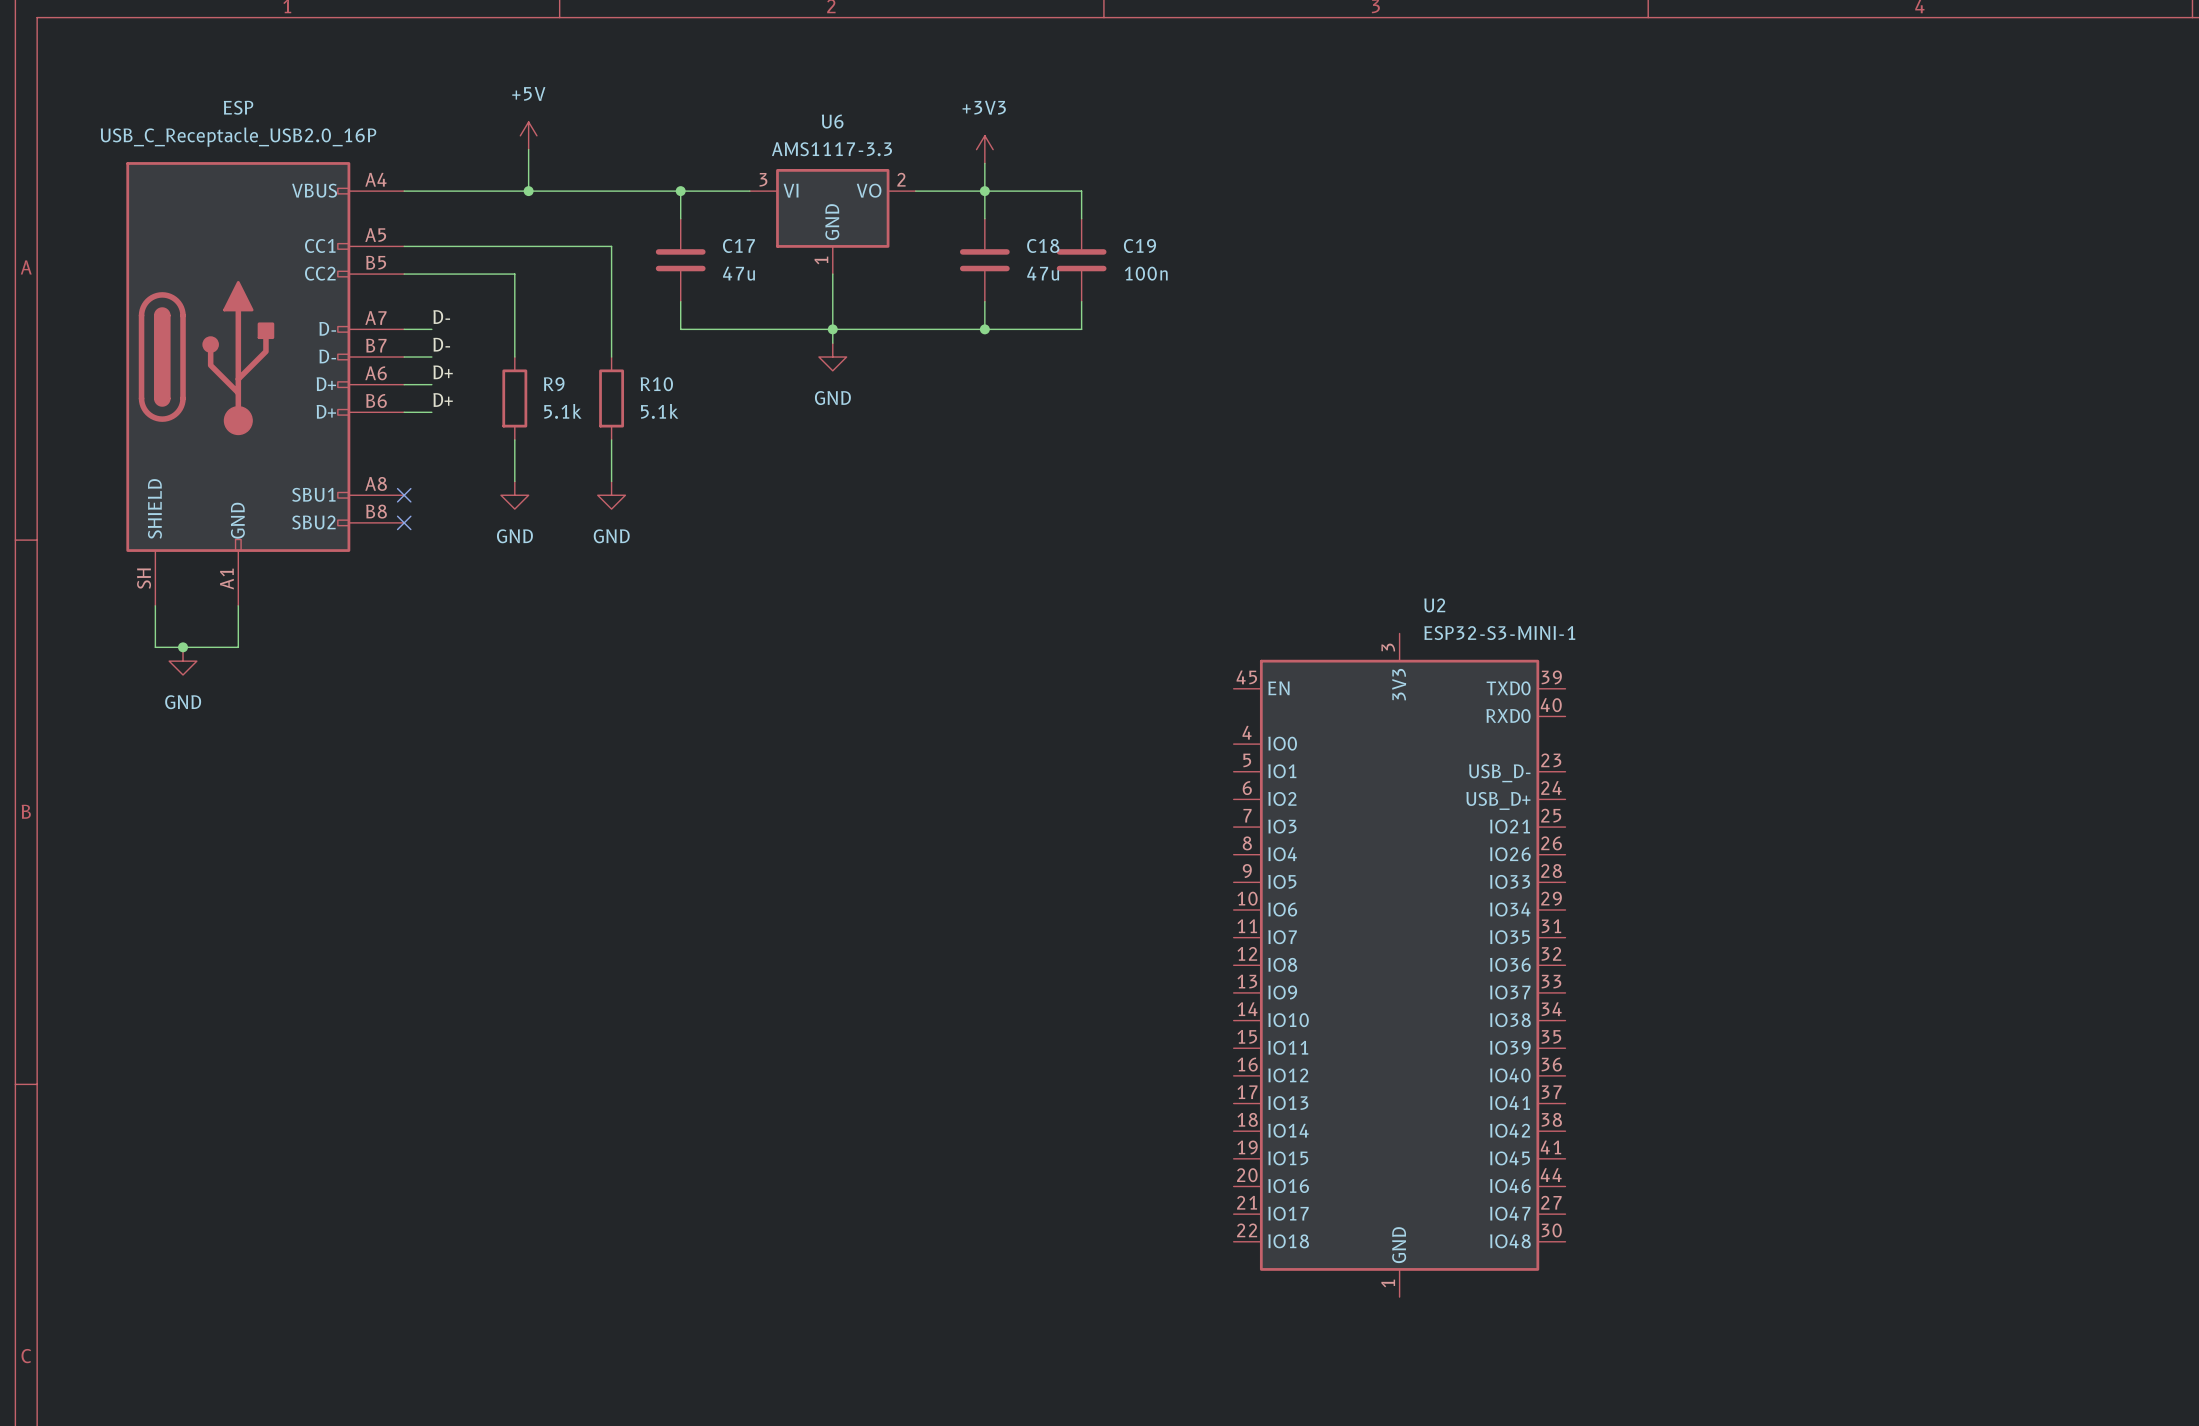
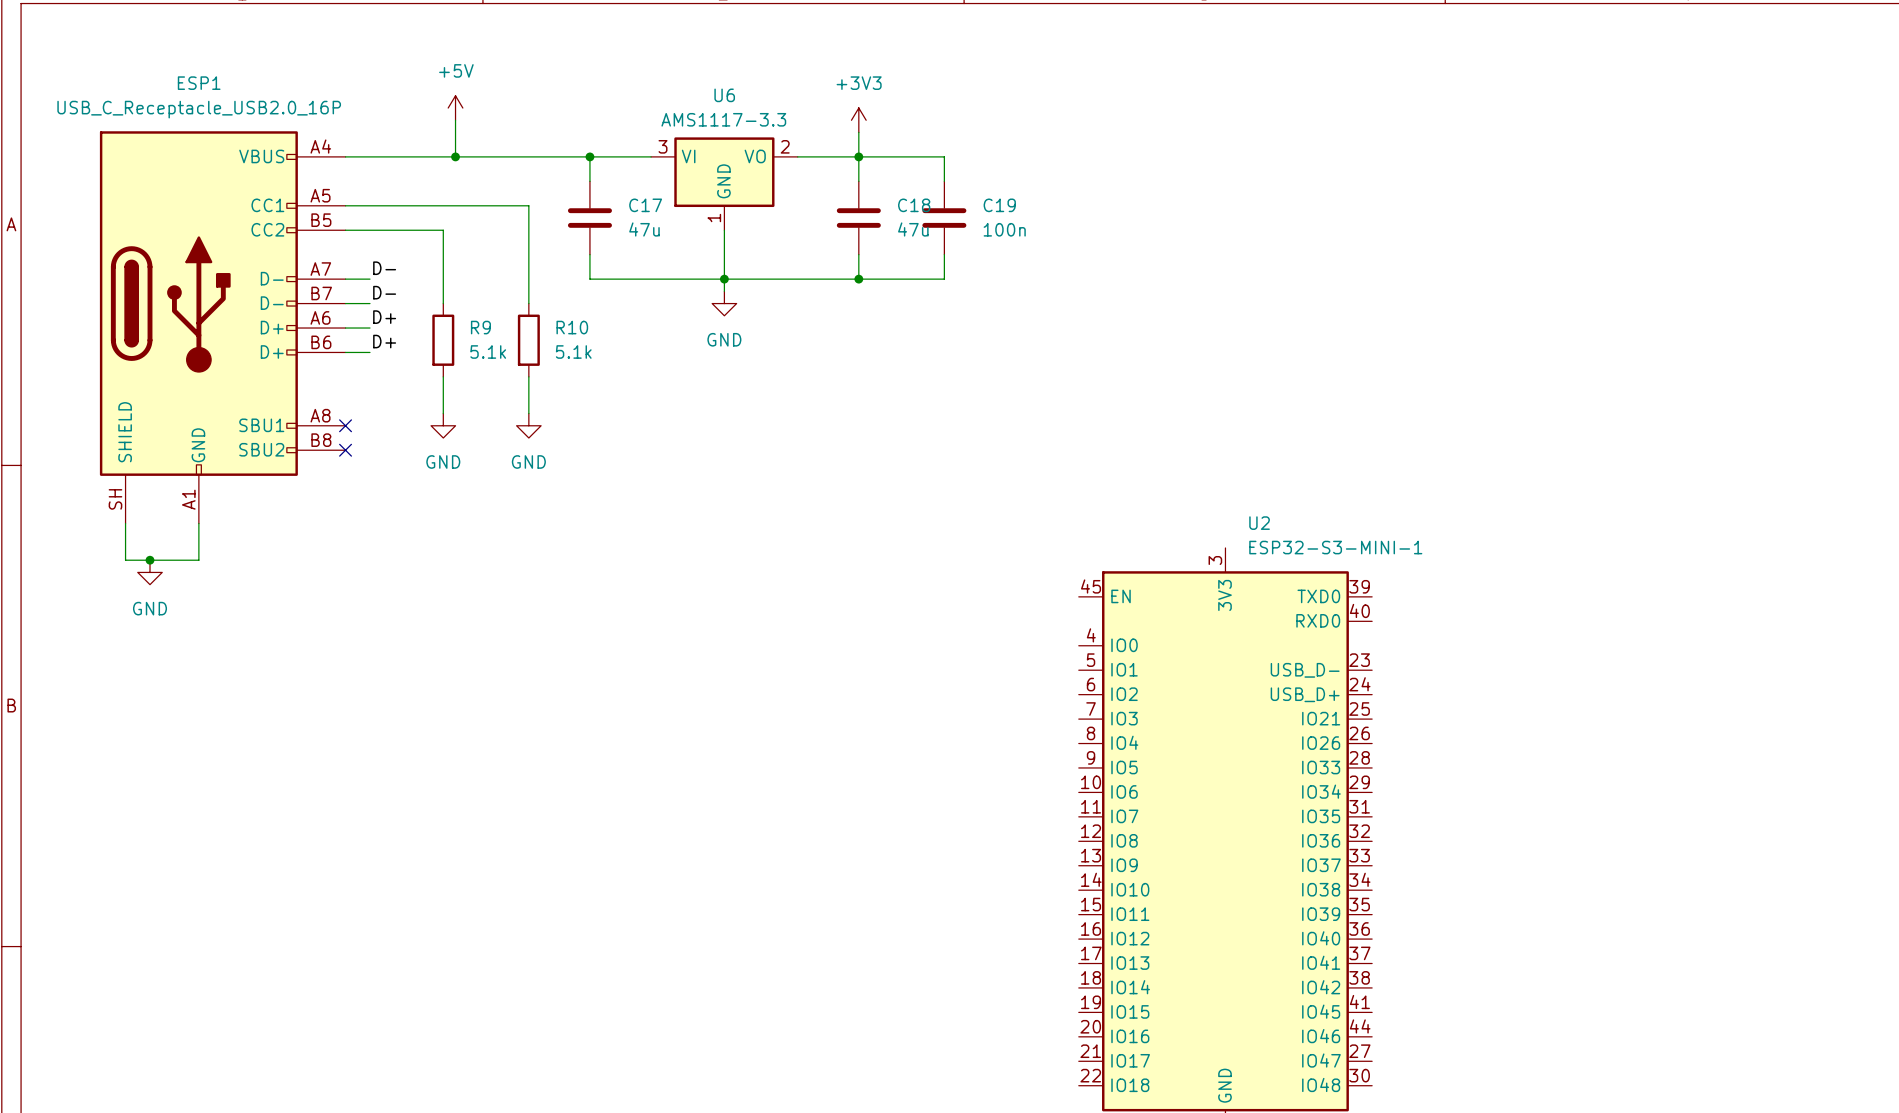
ESP name: ESP (238, 107) -> ESP1 (199, 83)

